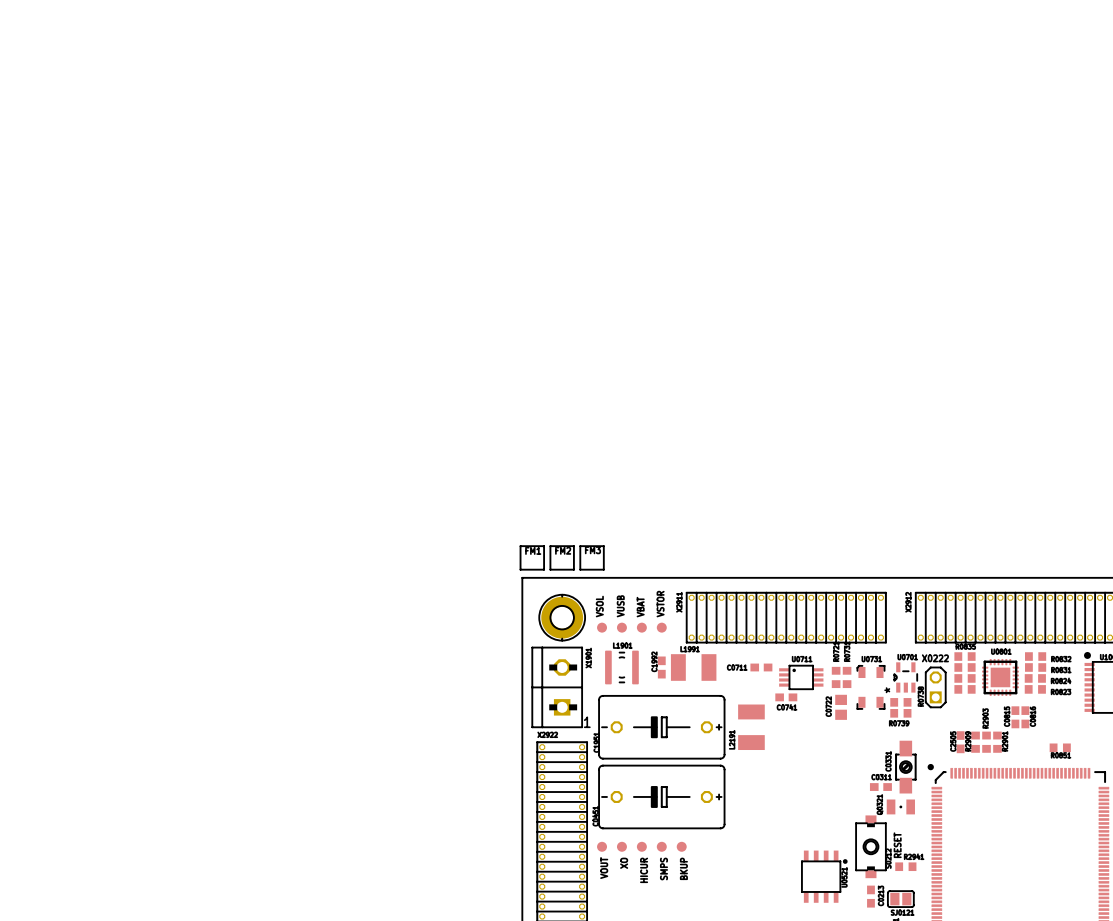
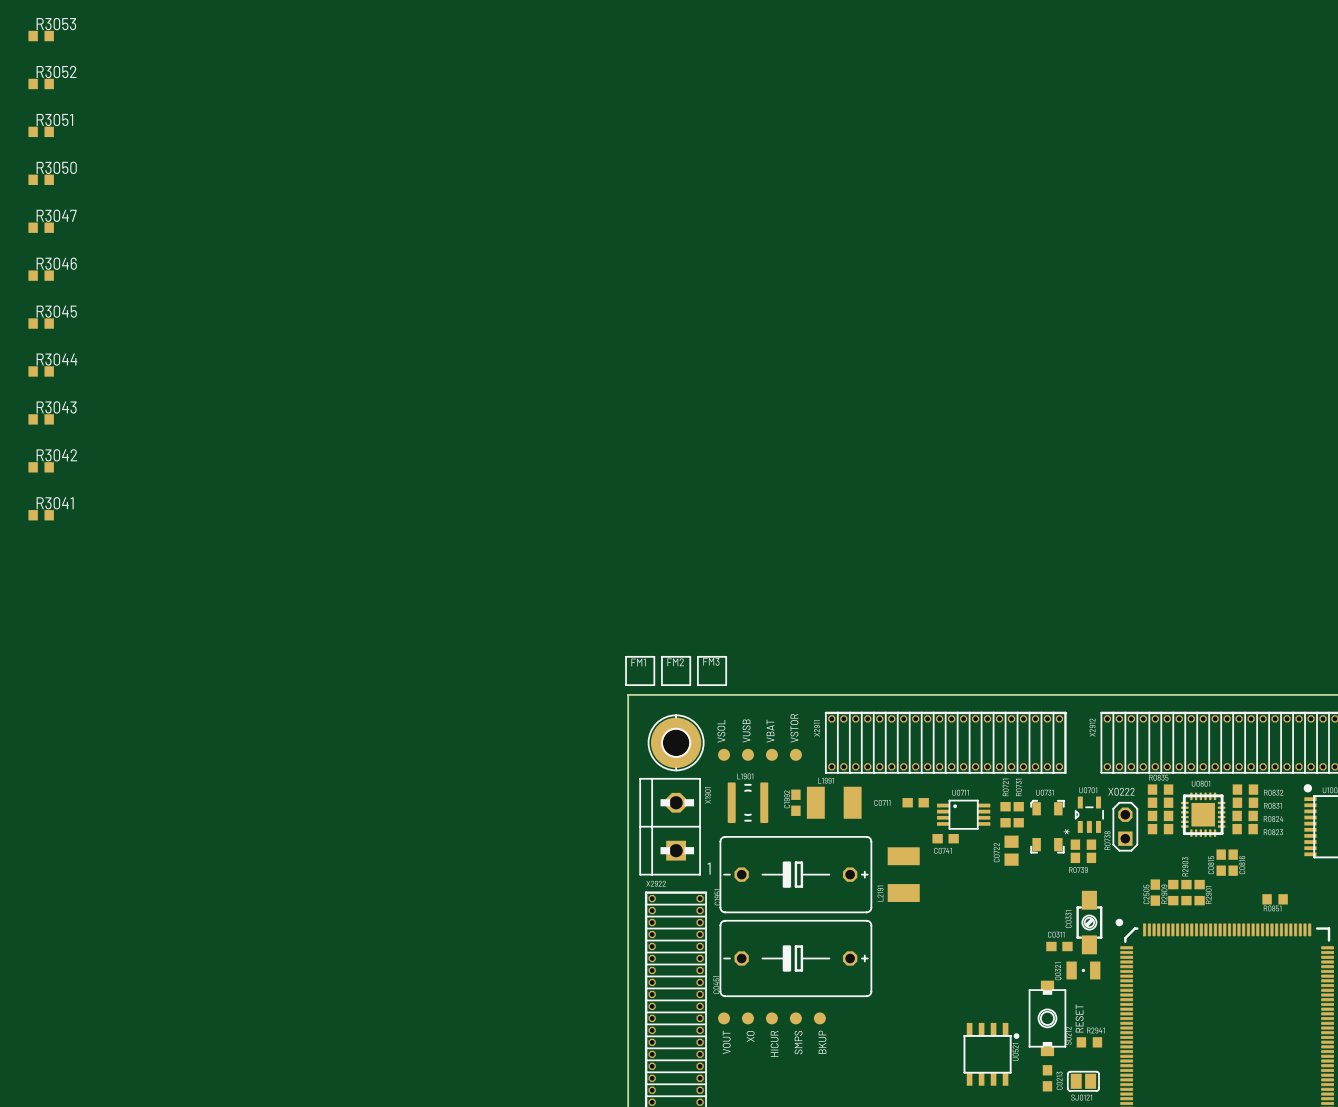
R3053: none -> (41, 36)
R3052: none -> (41, 83)
R3051: none -> (41, 131)
R3050: none -> (41, 179)
R3047: none -> (41, 227)
R3046: none -> (41, 275)
R3045: none -> (41, 323)
R3044: none -> (41, 371)
R3043: none -> (41, 419)
R3042: none -> (41, 467)
R3041: none -> (41, 515)

